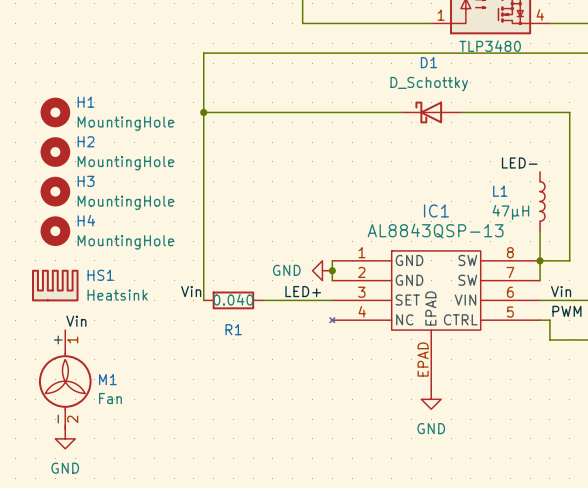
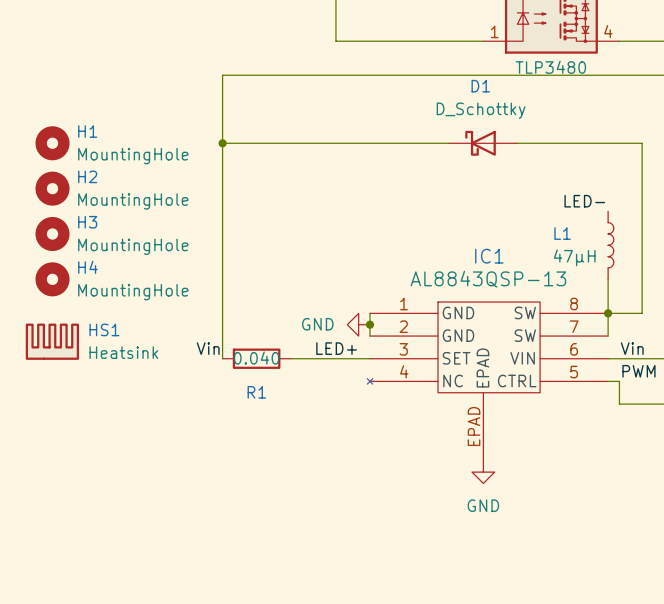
label: Vin (76, 321) -> none
M1: Fan (65, 379) -> none
power symbol: GND (65, 438) -> none

